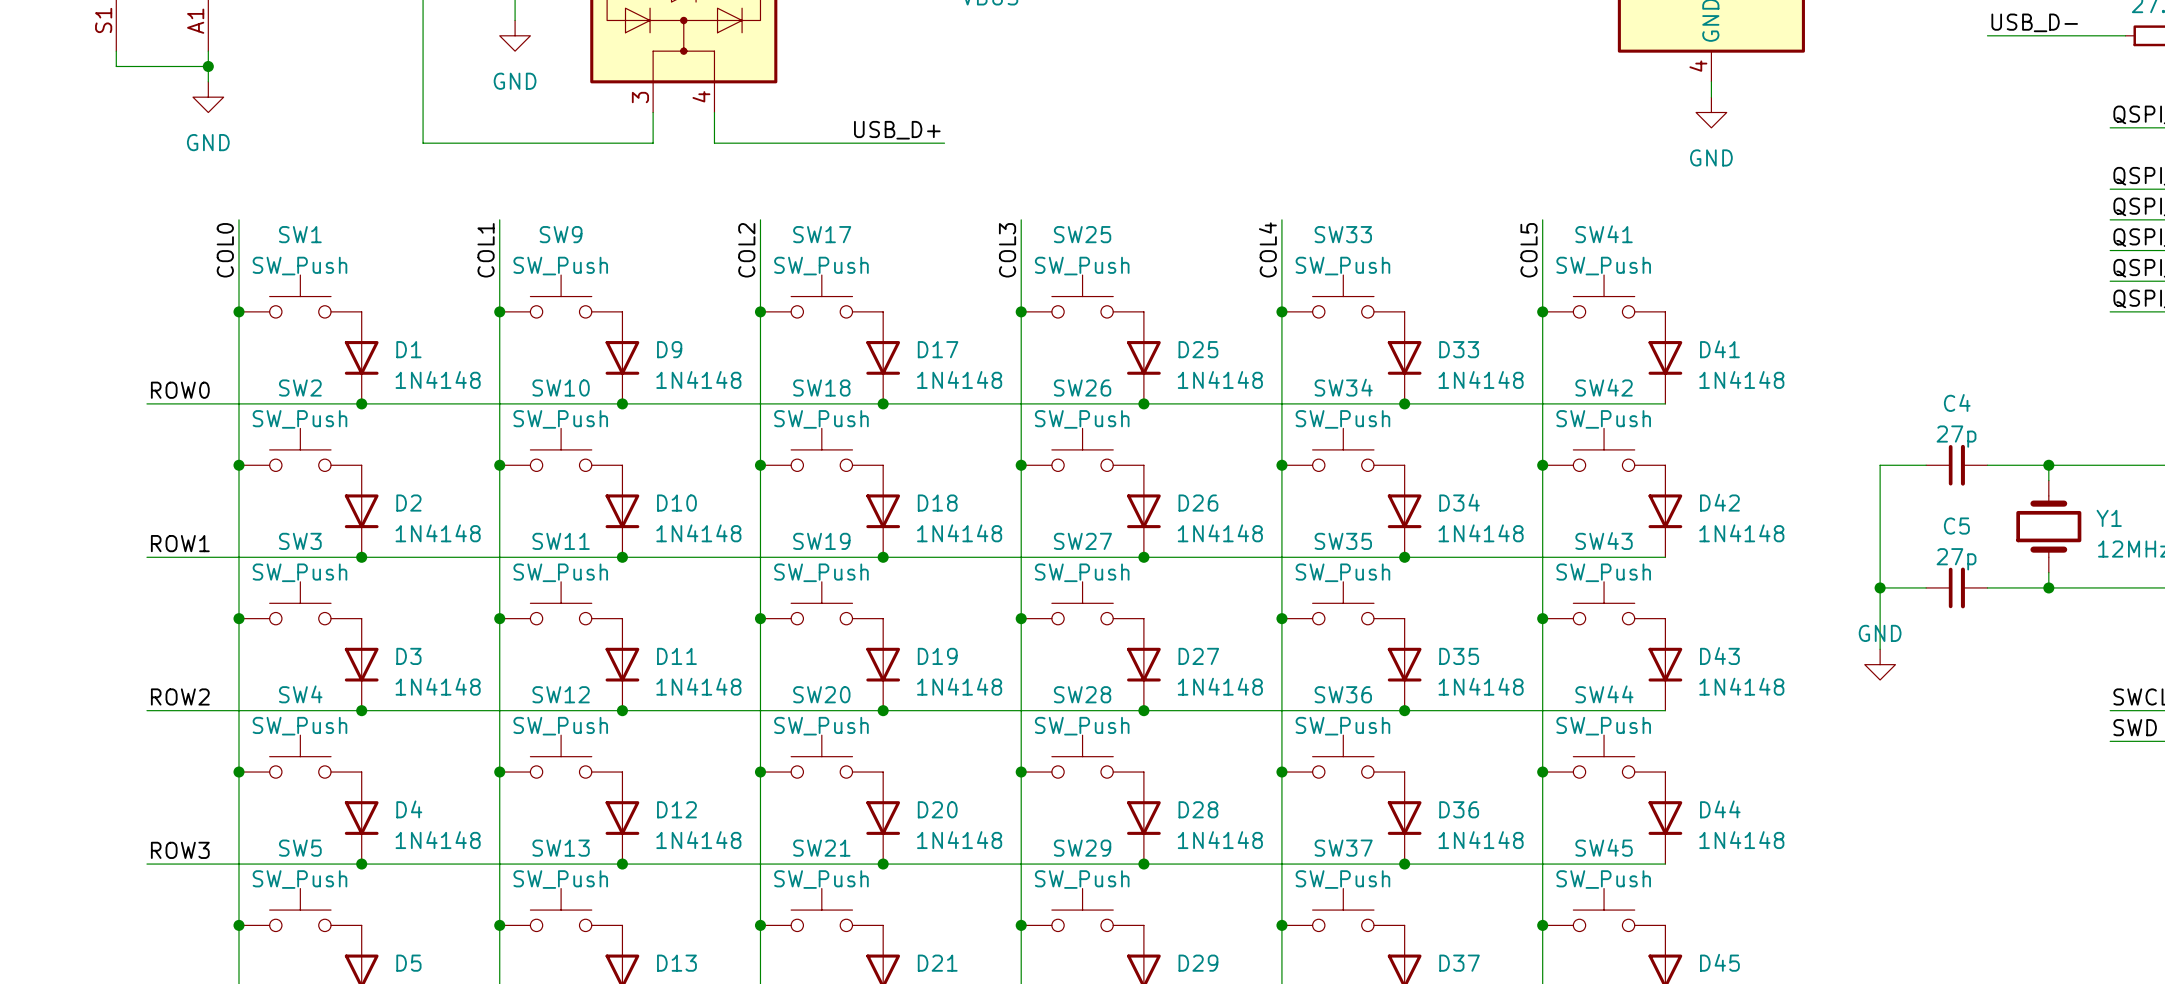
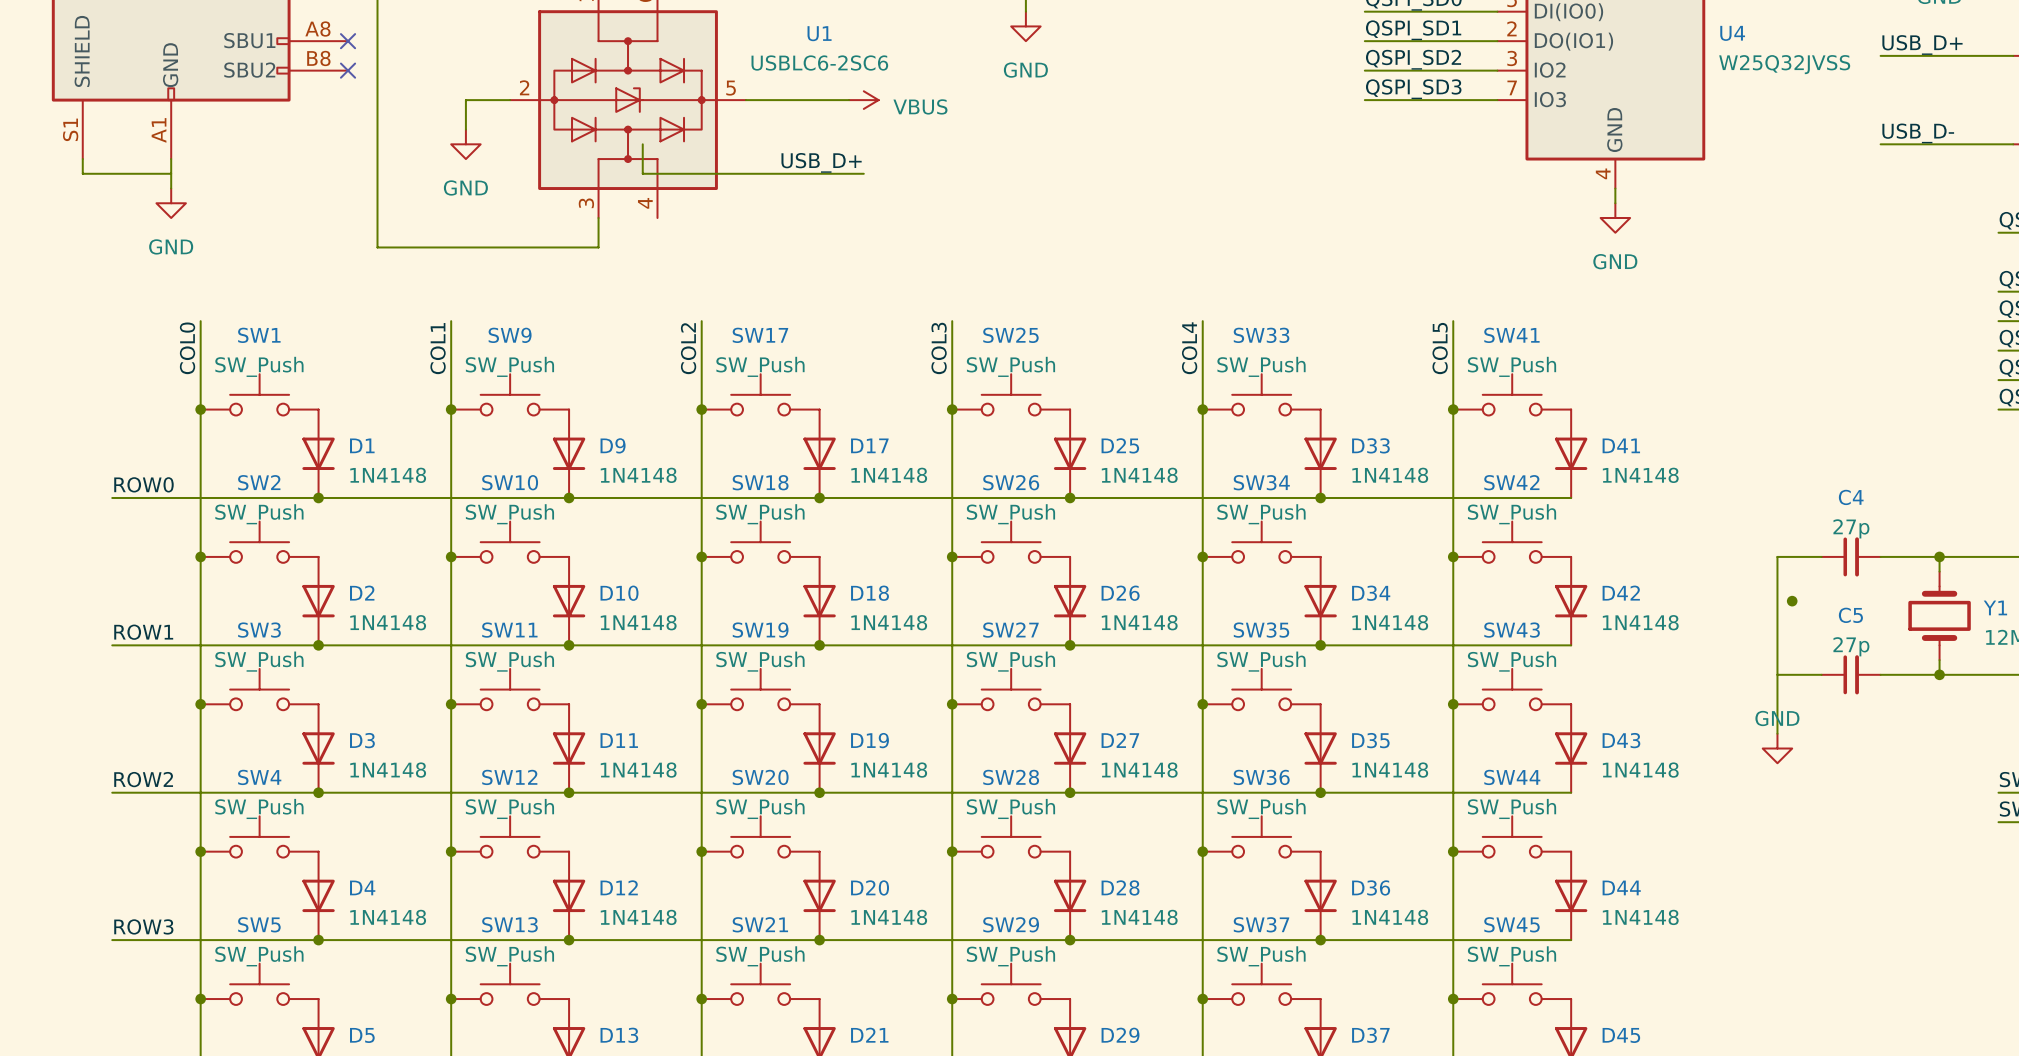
junction: (208, 66) -> none
wire: (714, 112) (714, 143) (944, 143) -> (642, 144) (642, 173) (863, 173)
label position: USB_D+ (897, 130) -> USB_D+ (821, 162)
junction: none -> (1792, 601)
junction: (1880, 587) -> none

